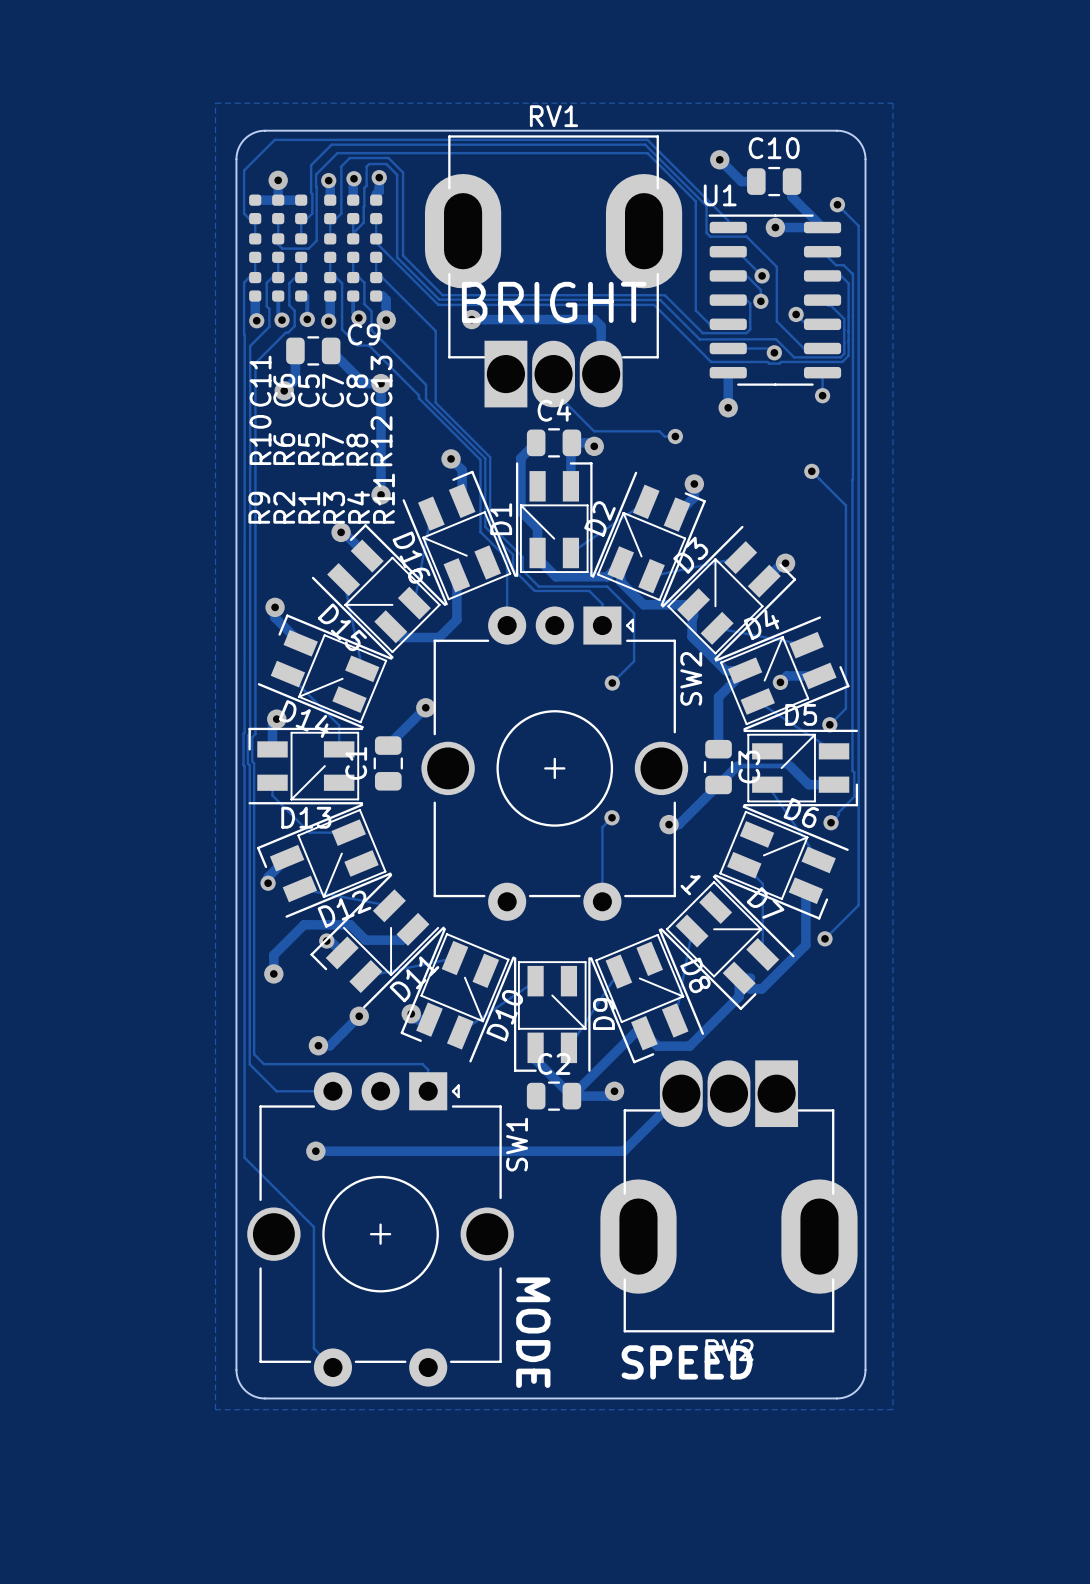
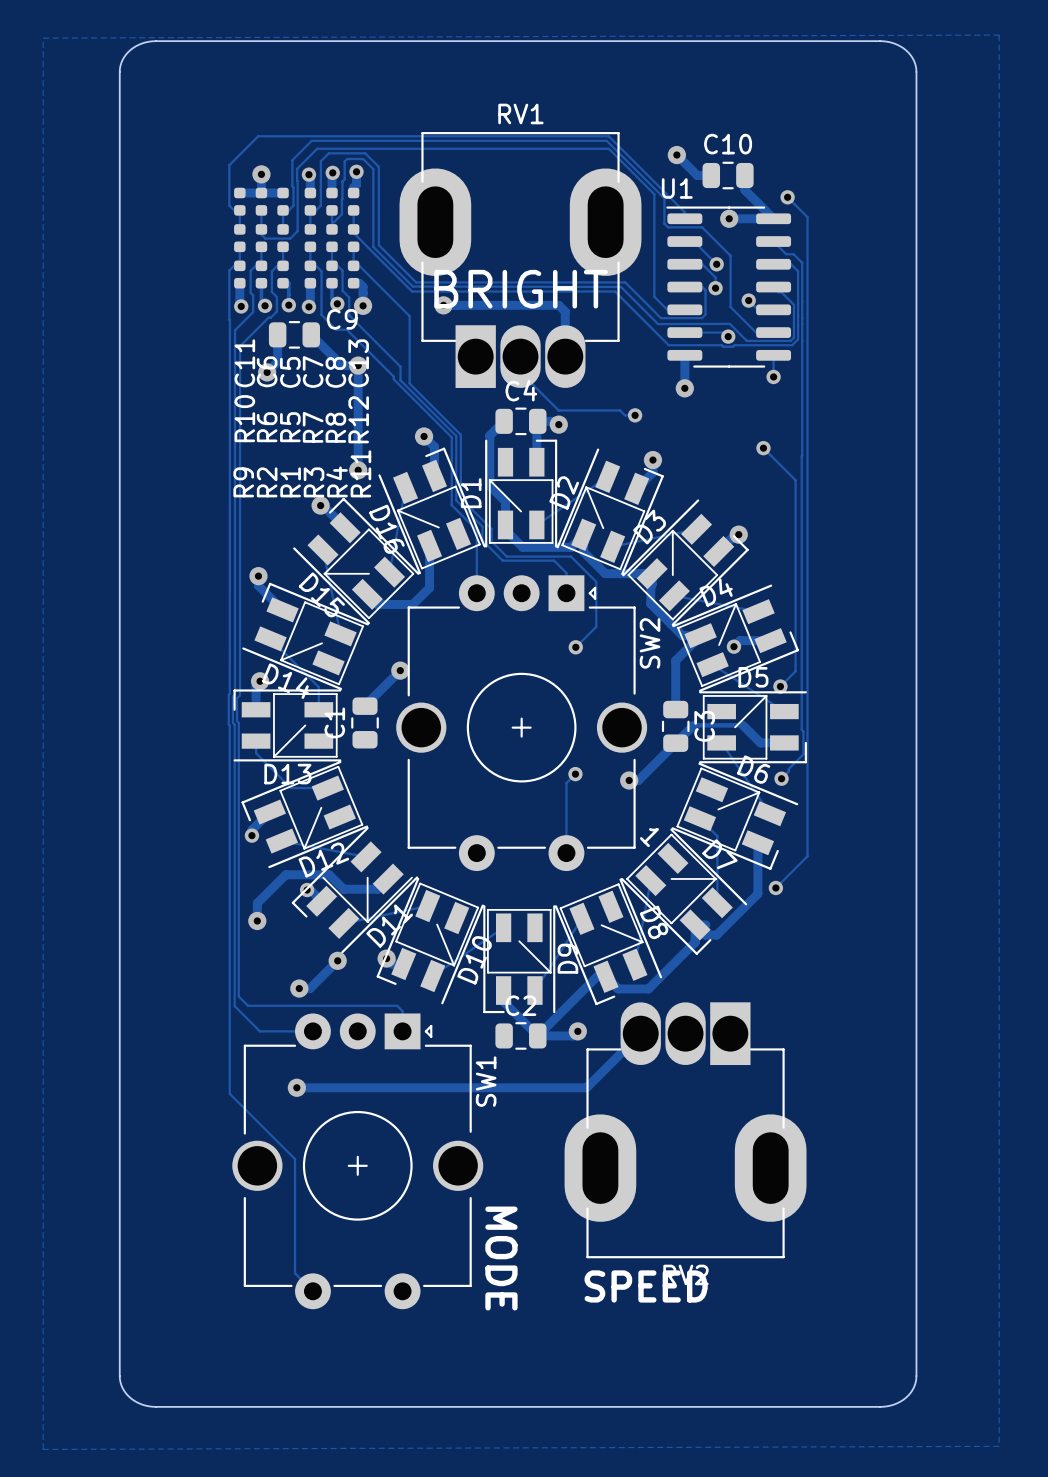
zone outline: (215, 103) (892, 103) (892, 1409) (215, 1409) (215, 103) -> (999, 35) (43, 38) (43, 1449) (999, 1446) (999, 35)
board edge: (265, 130) (836, 130) (852, 135) (863, 148) (865, 159) (865, 1369) (860, 1385) (848, 1396) (836, 1398) (265, 1398) (249, 1393) (238, 1381) (236, 1369) (236, 159) (238, 148) (244, 139) (253, 132) (265, 130) -> (155, 41) (141, 43) (130, 50) (122, 59) (119, 71) (119, 1376) (122, 1388) (135, 1401) (155, 1406) (880, 1406) (900, 1401) (912, 1390) (916, 1376) (916, 71) (913, 59) (900, 46) (880, 41) (155, 41)

